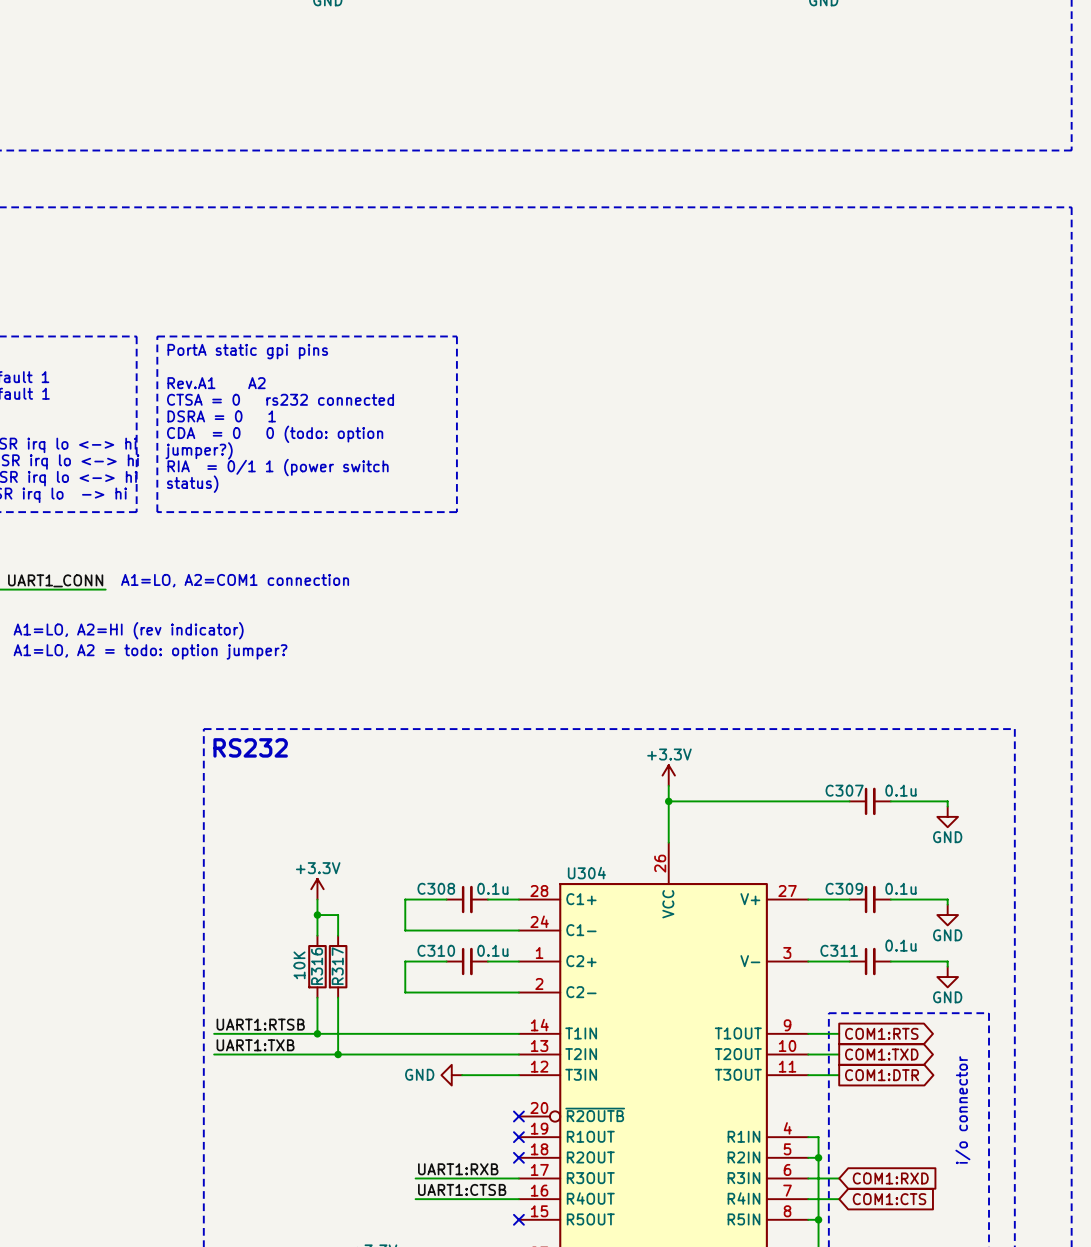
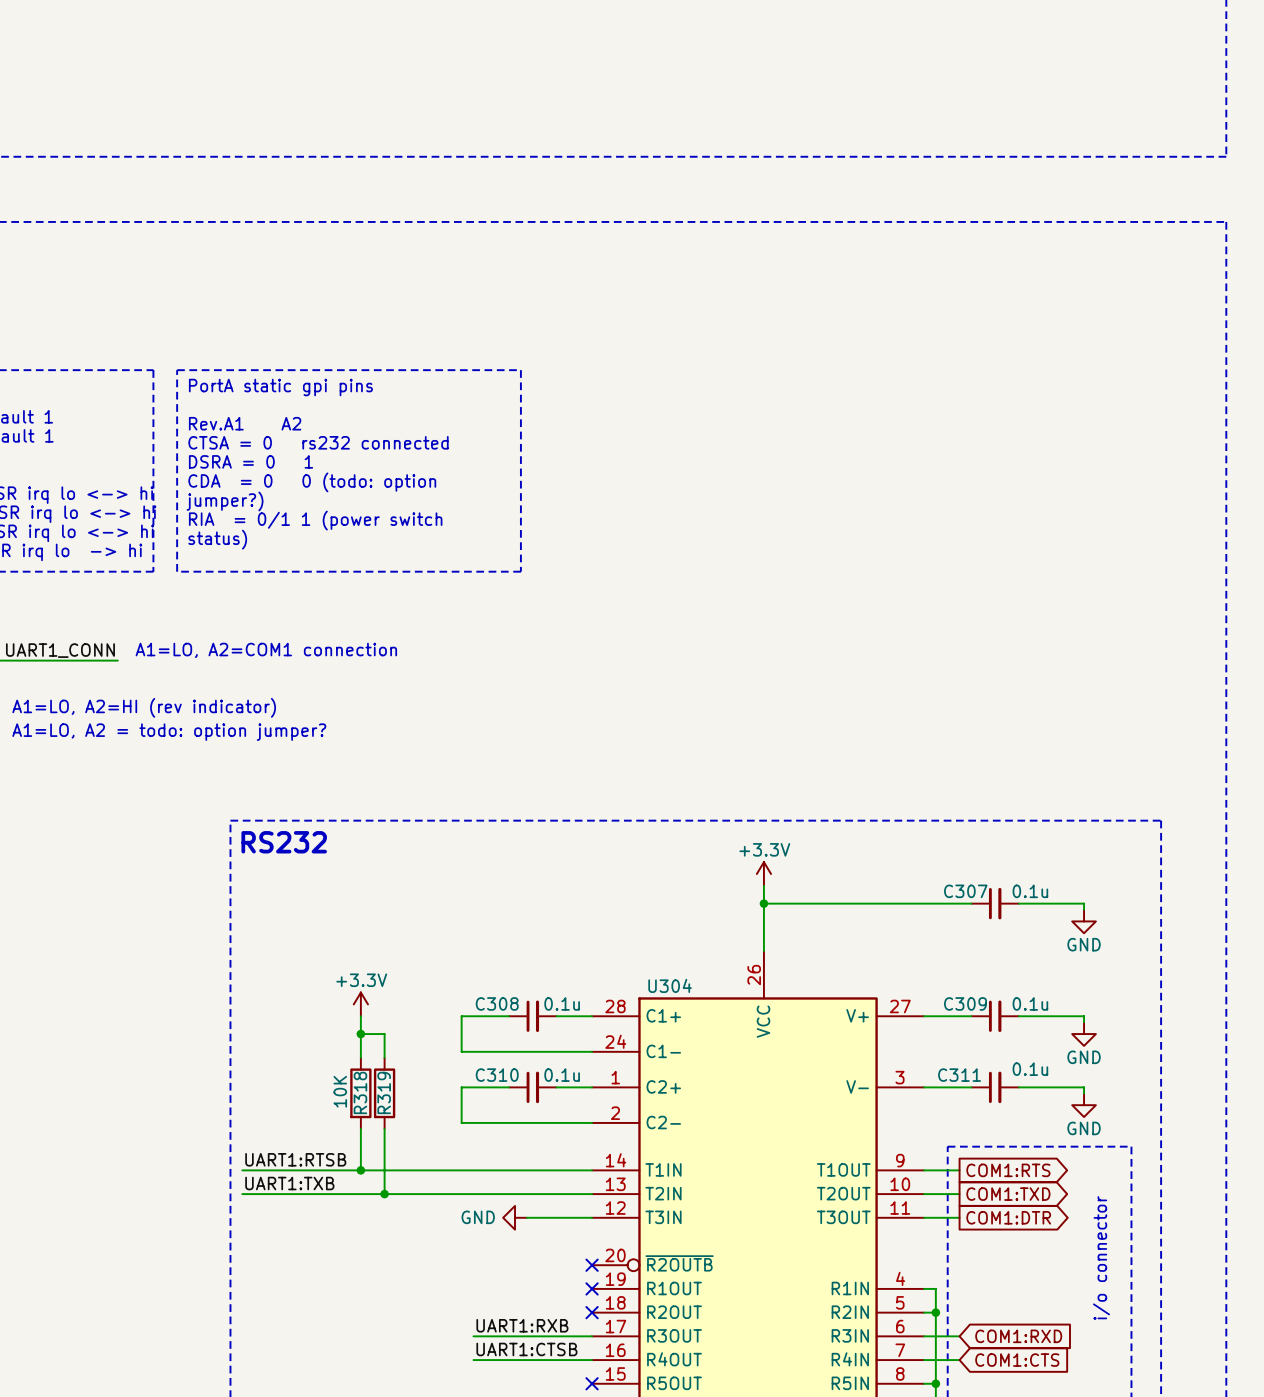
R316 name: R316 (317, 966) -> R318 (360, 1092)
R317 name: R317 (337, 966) -> R319 (384, 1092)

